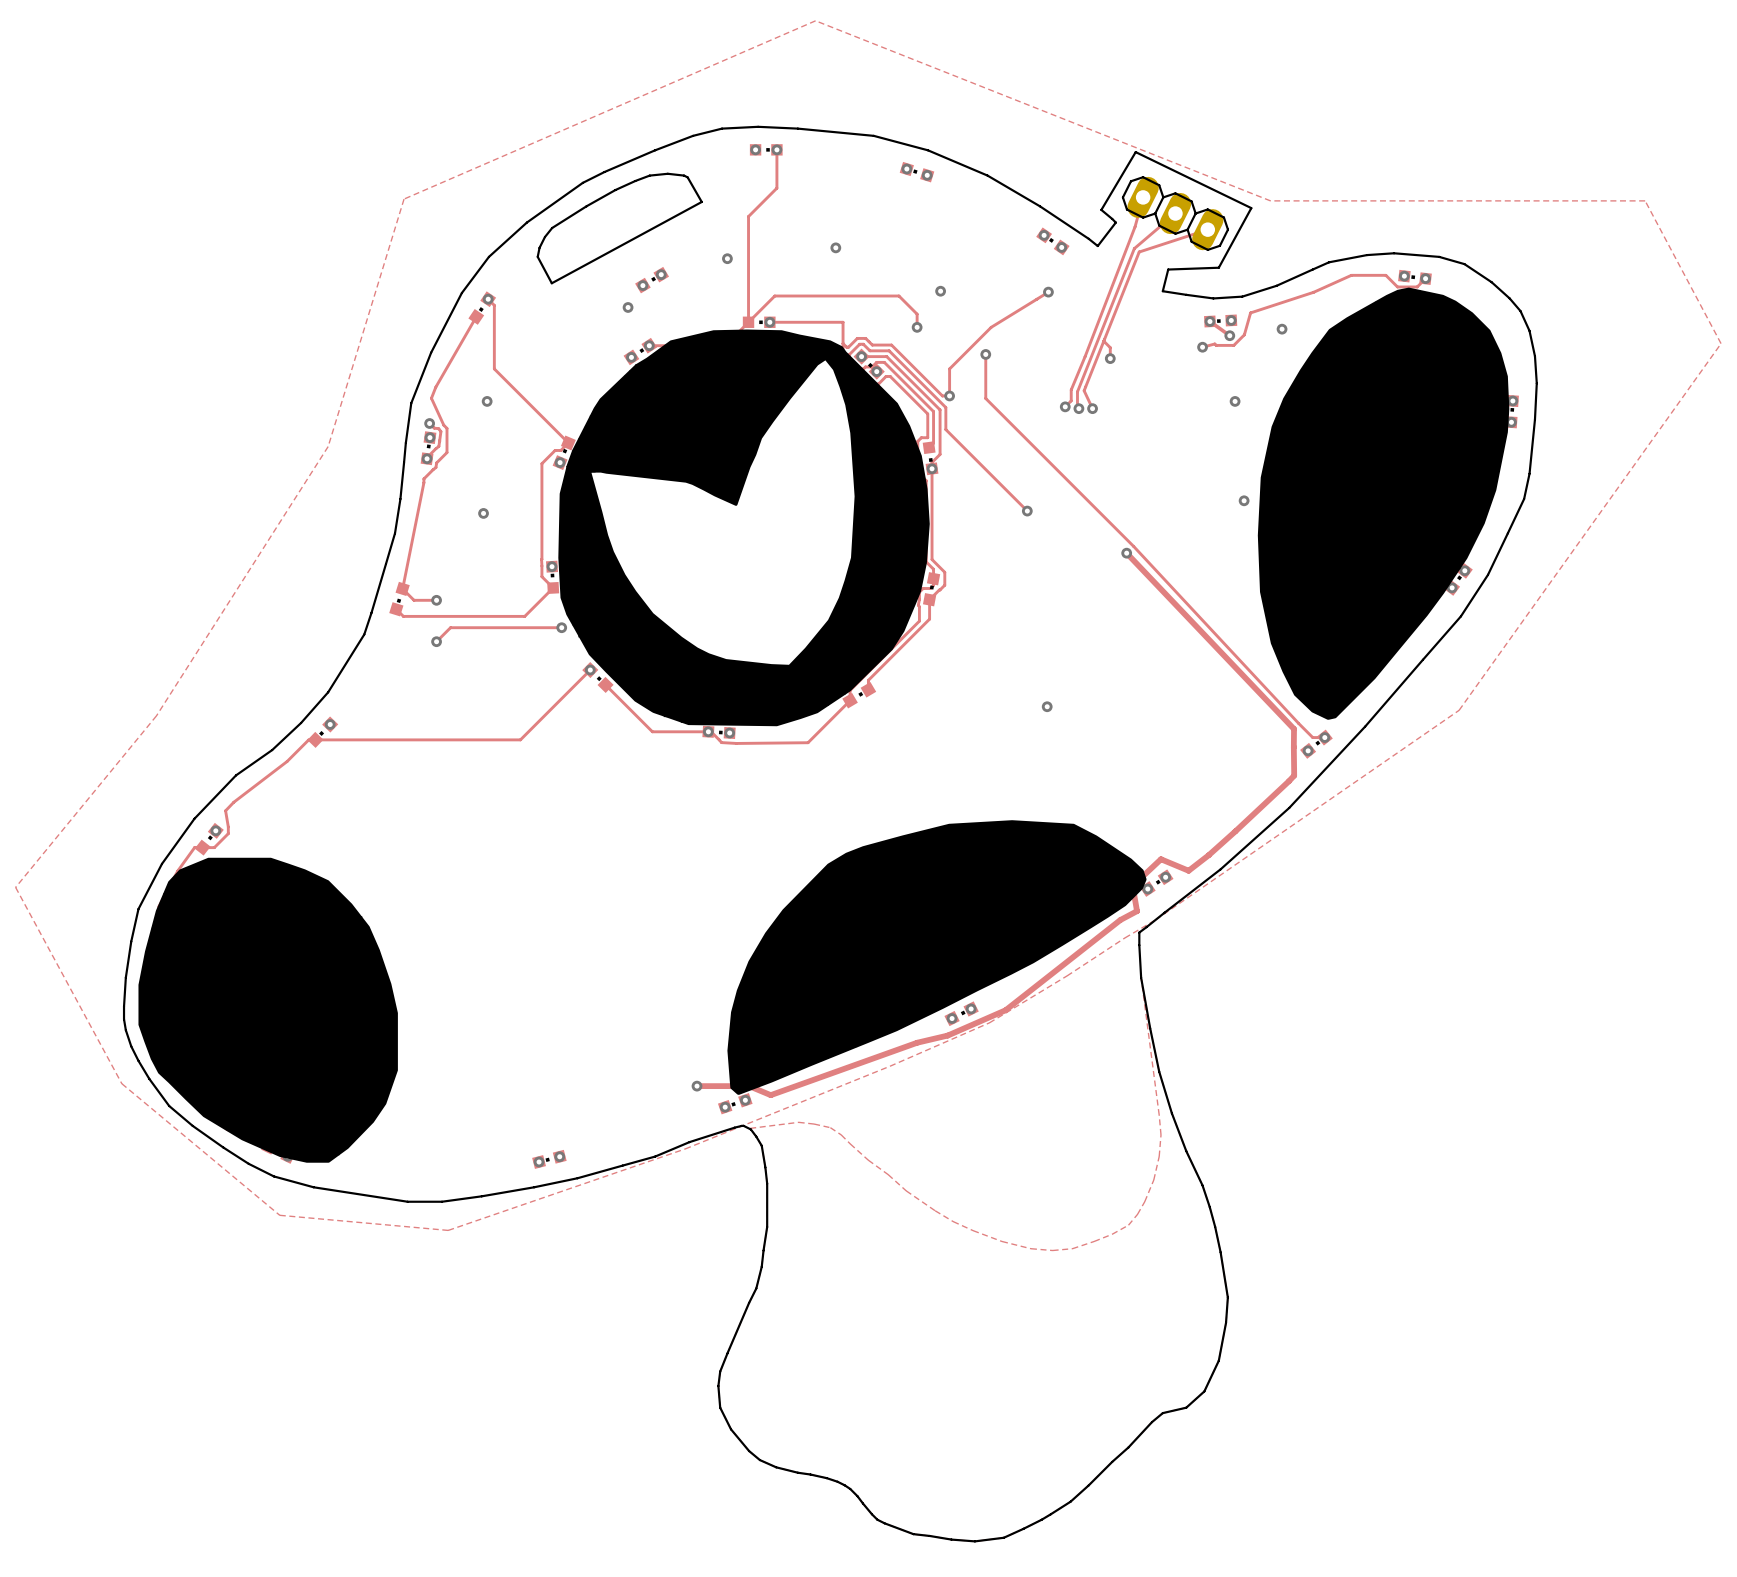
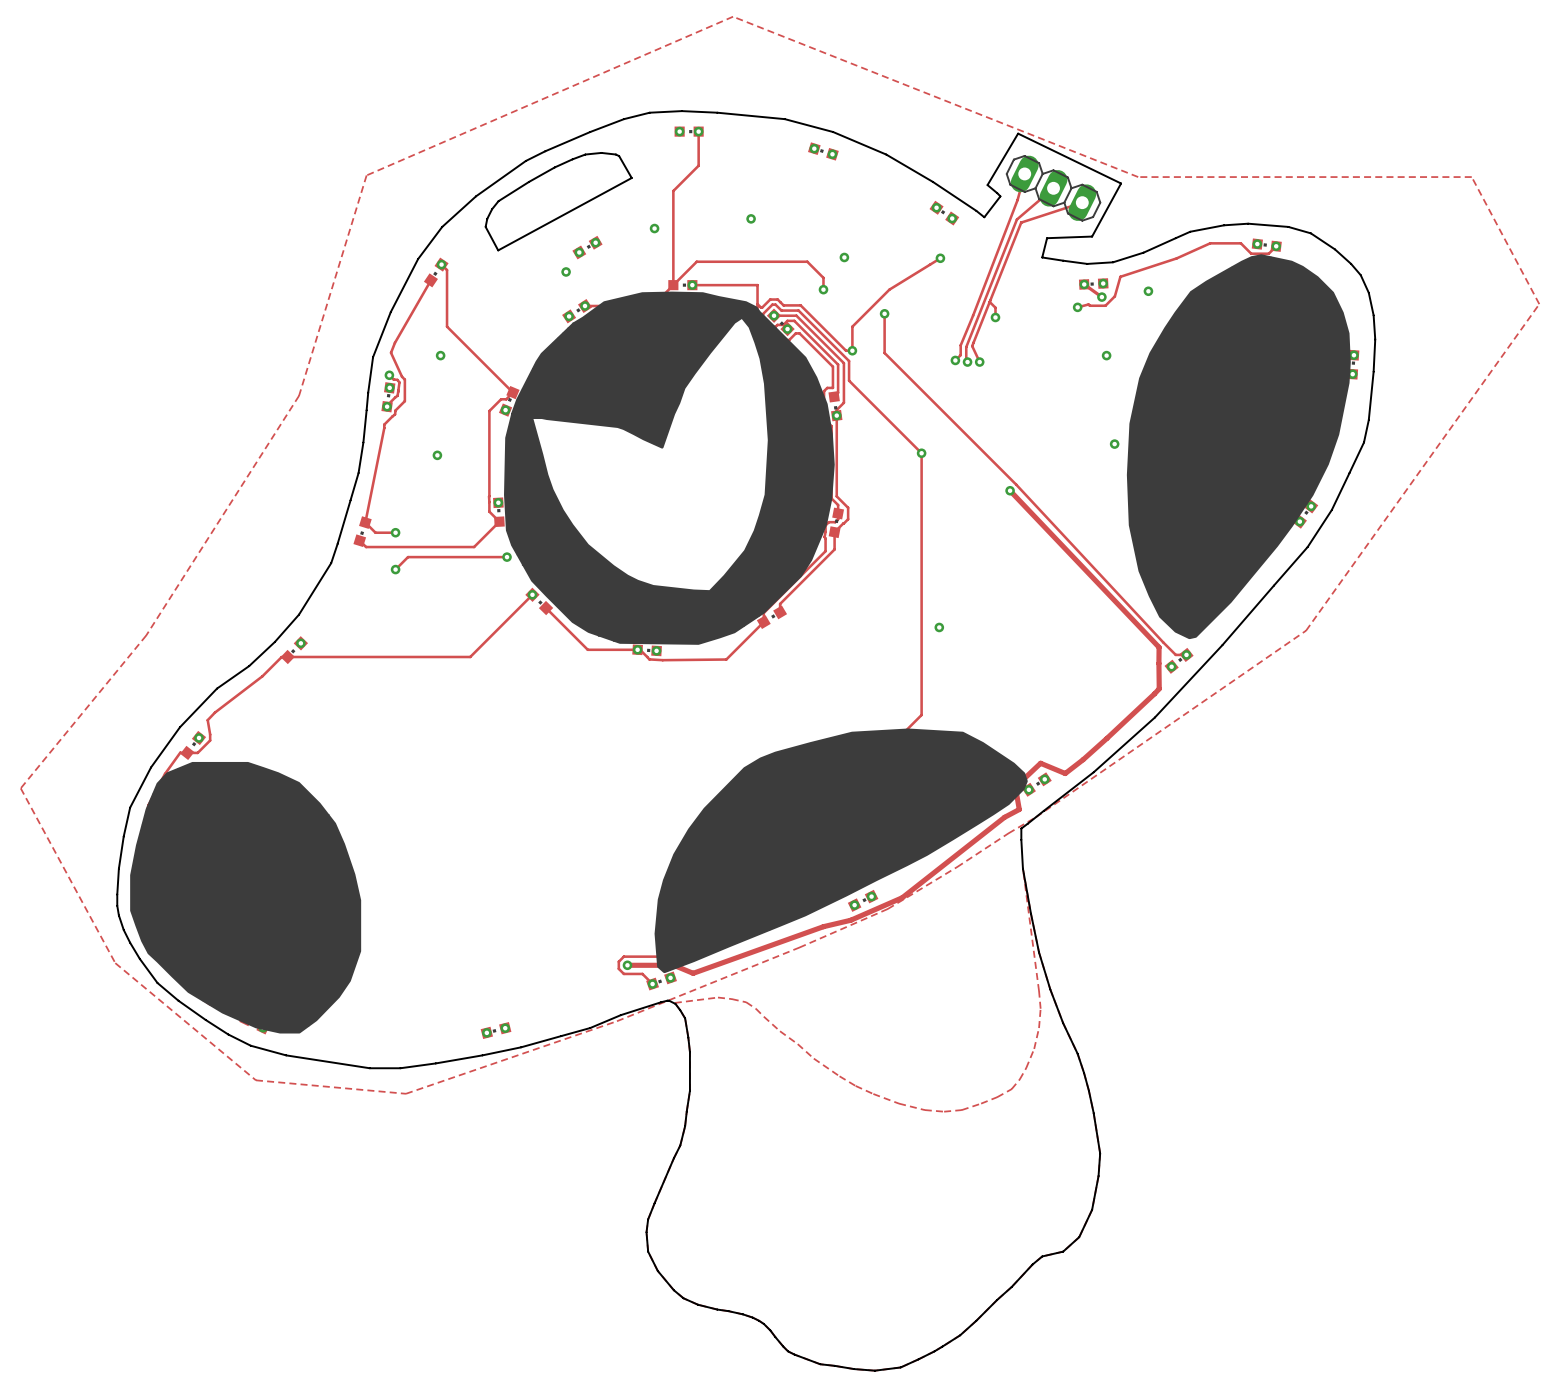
track: none -> (921, 453) (921, 715) (679, 956) (623, 956) (618, 961) (618, 968) (623, 973) (642, 973) (652, 984)

